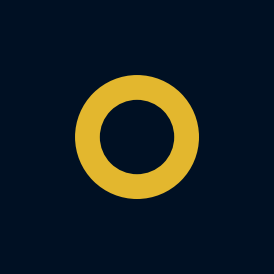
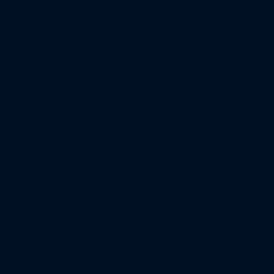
part: (137, 137) -> none

